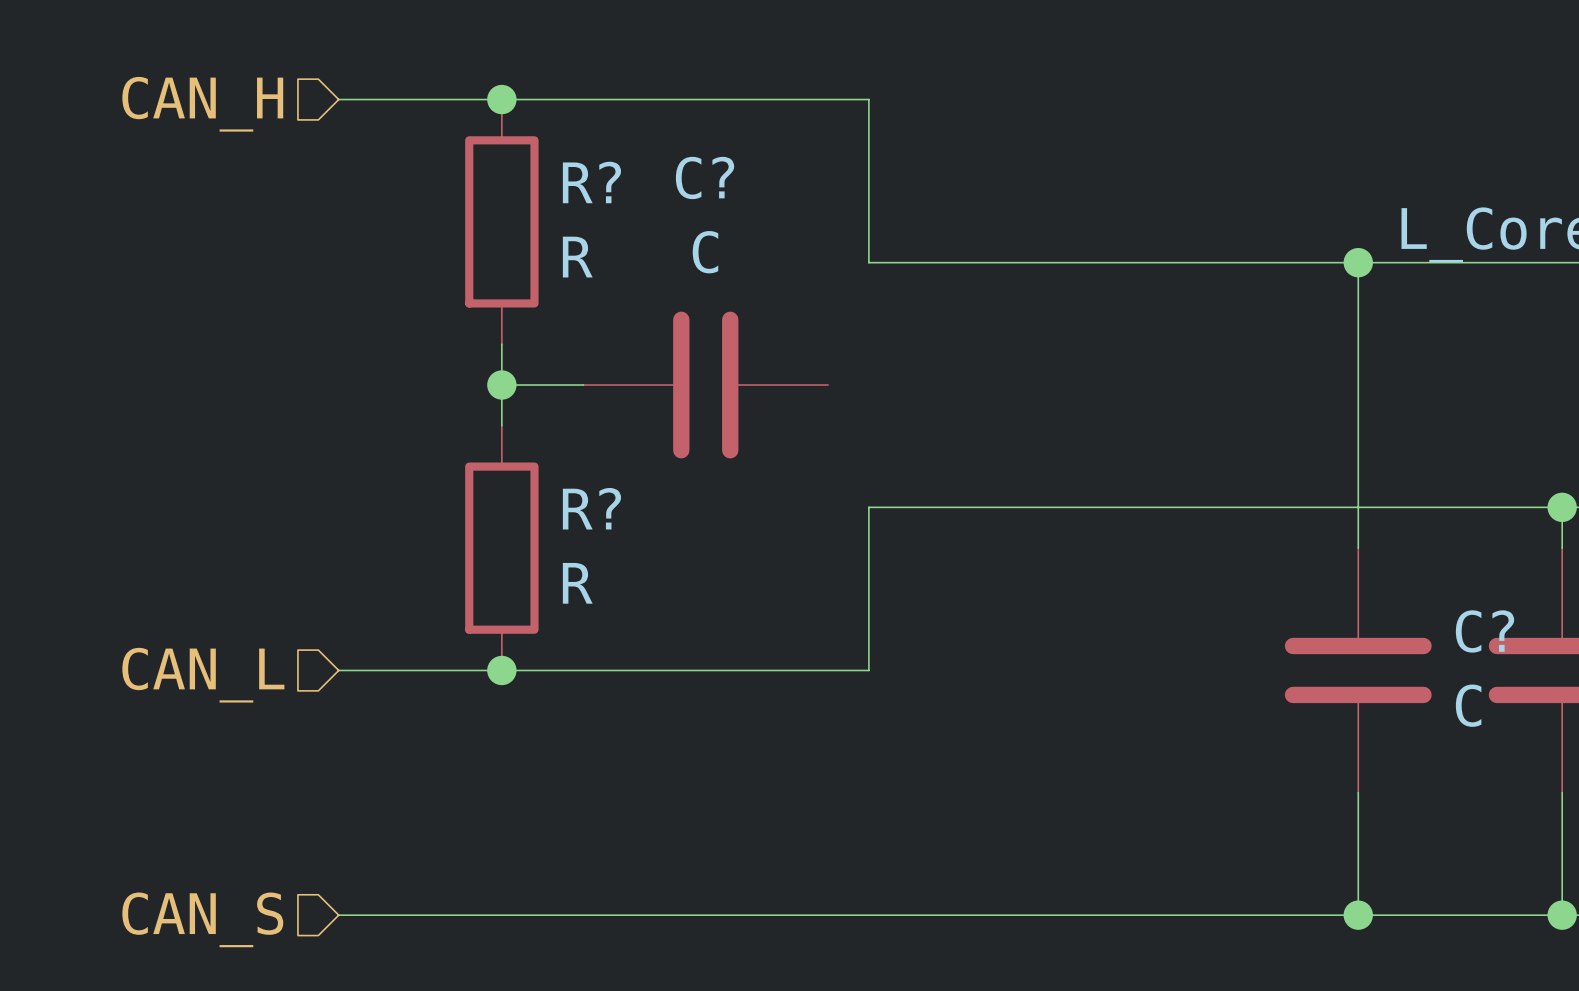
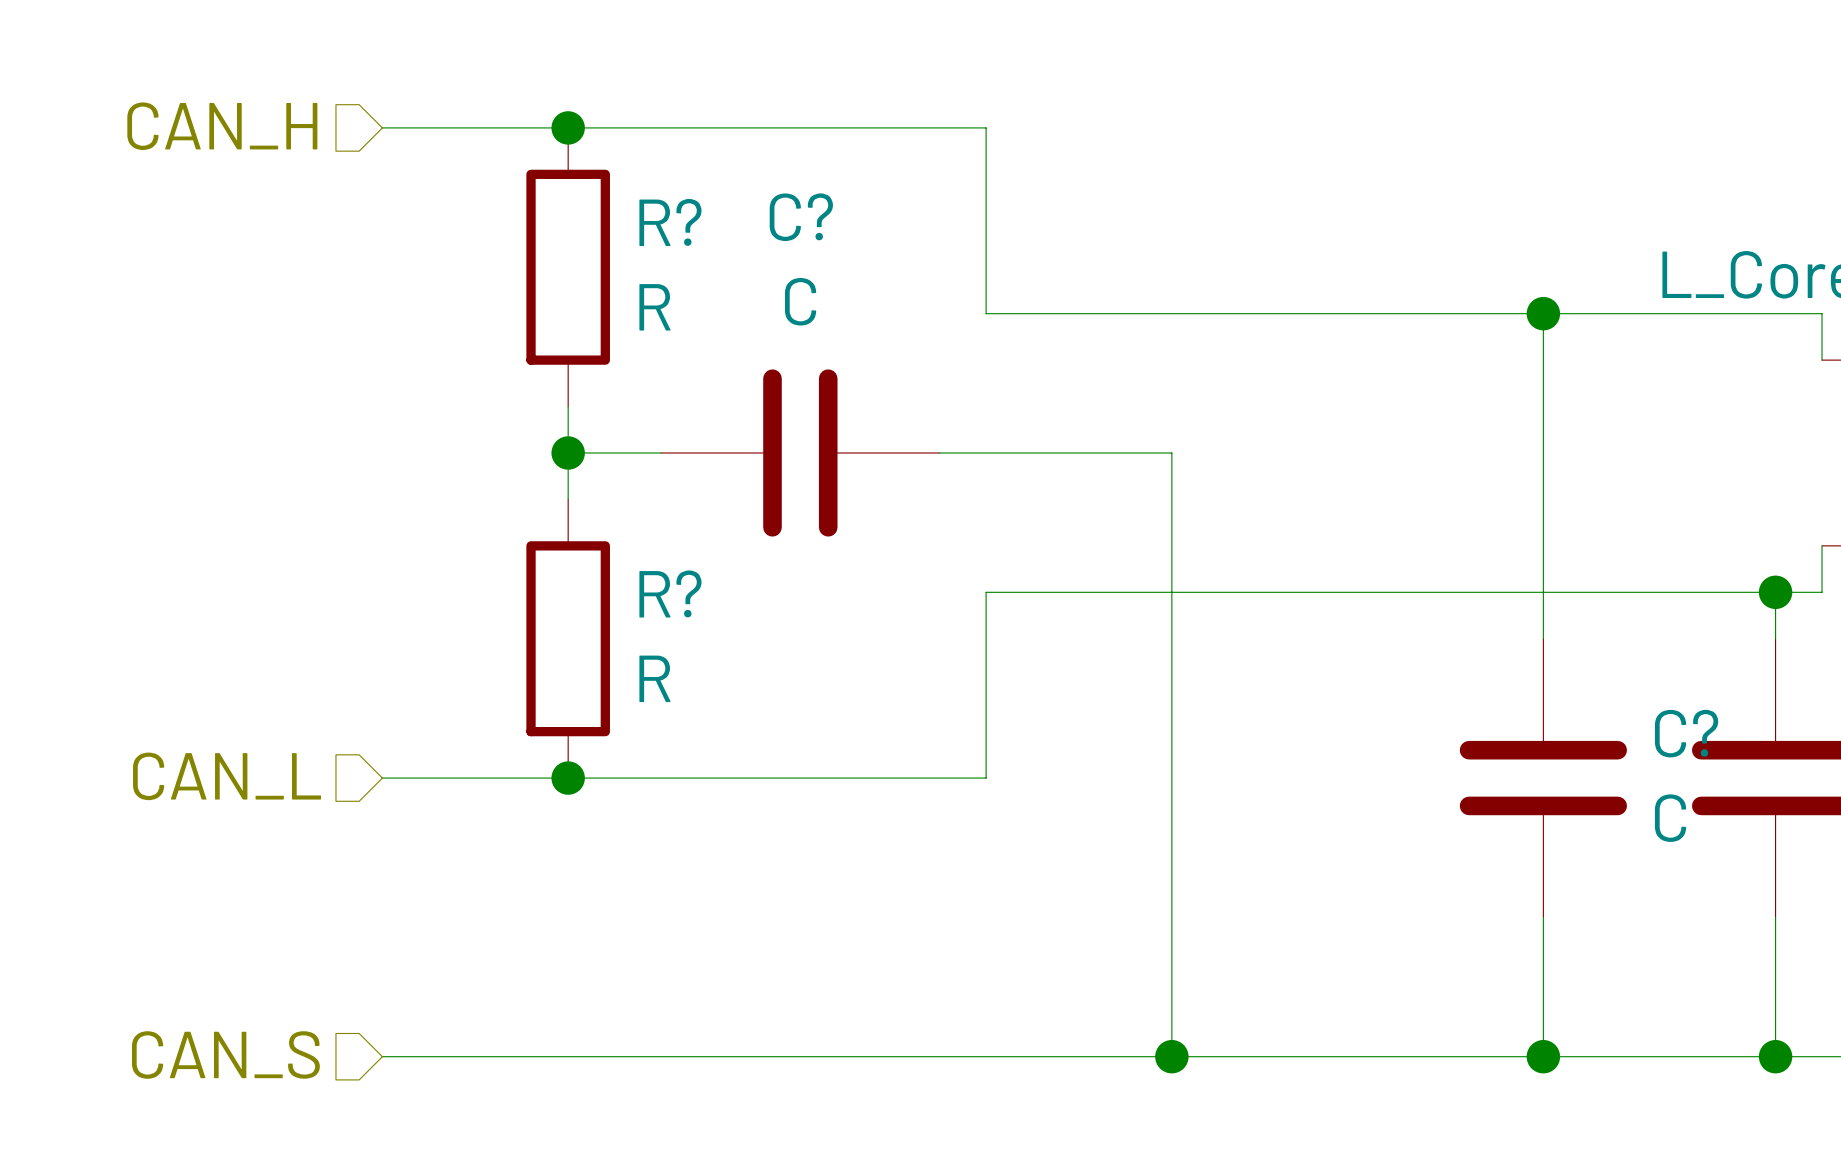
wire: none -> (939, 452) (1171, 452) (1171, 1056)
junction: none -> (1171, 1056)

